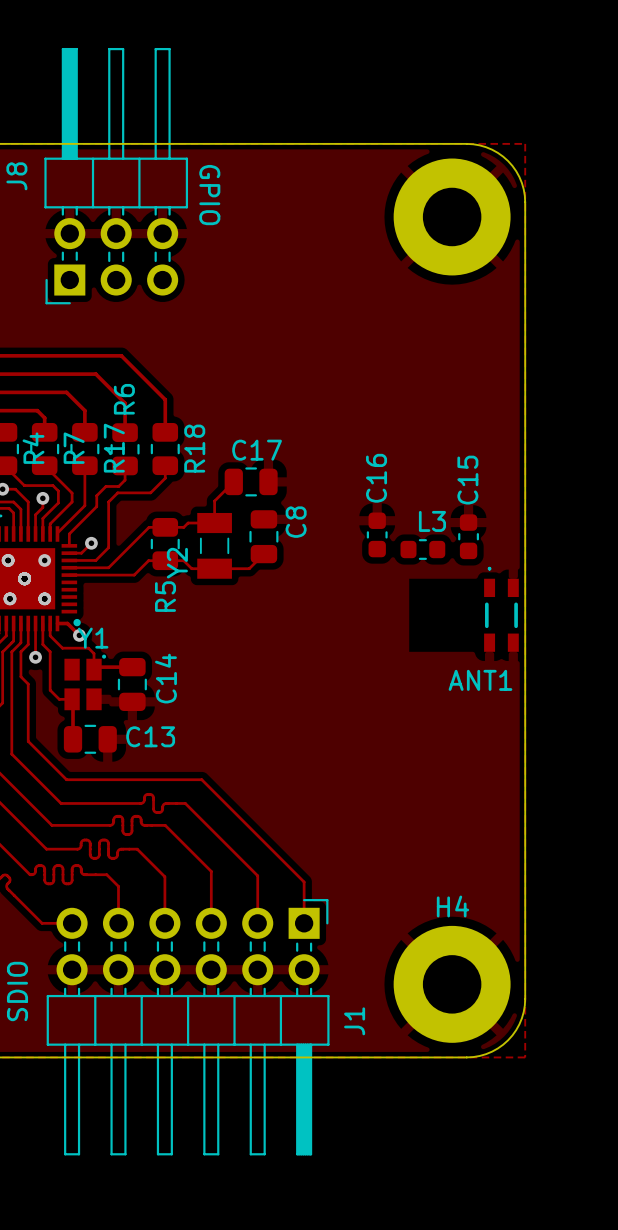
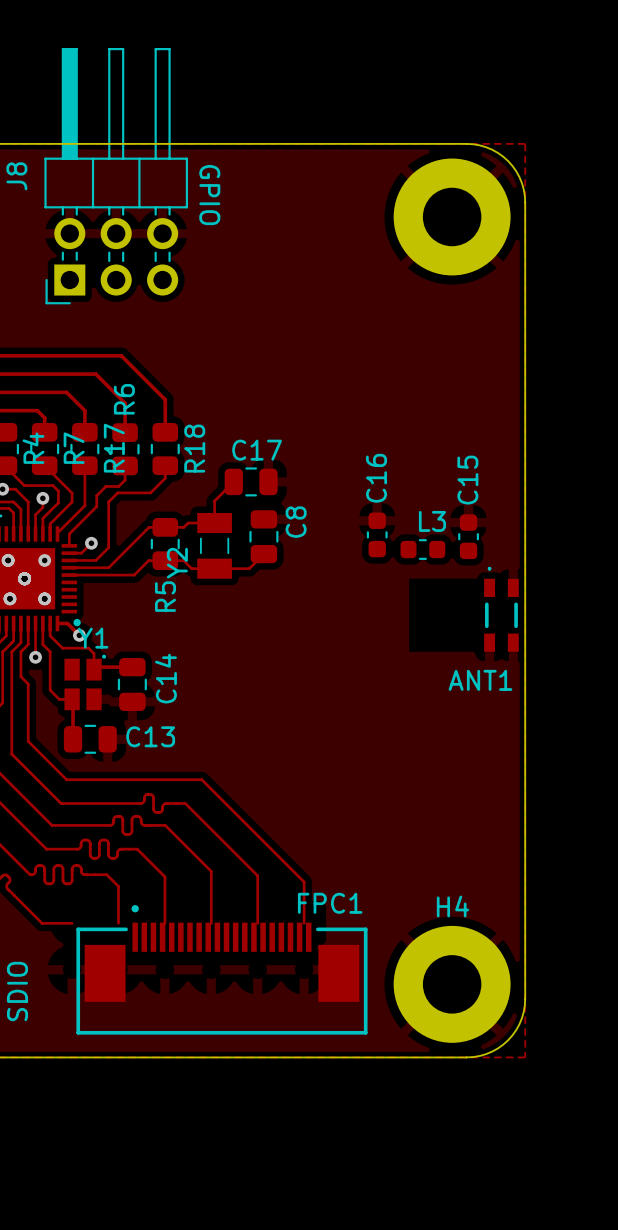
FPC1: none -> (221, 969)
J1: (188, 1027) -> none

